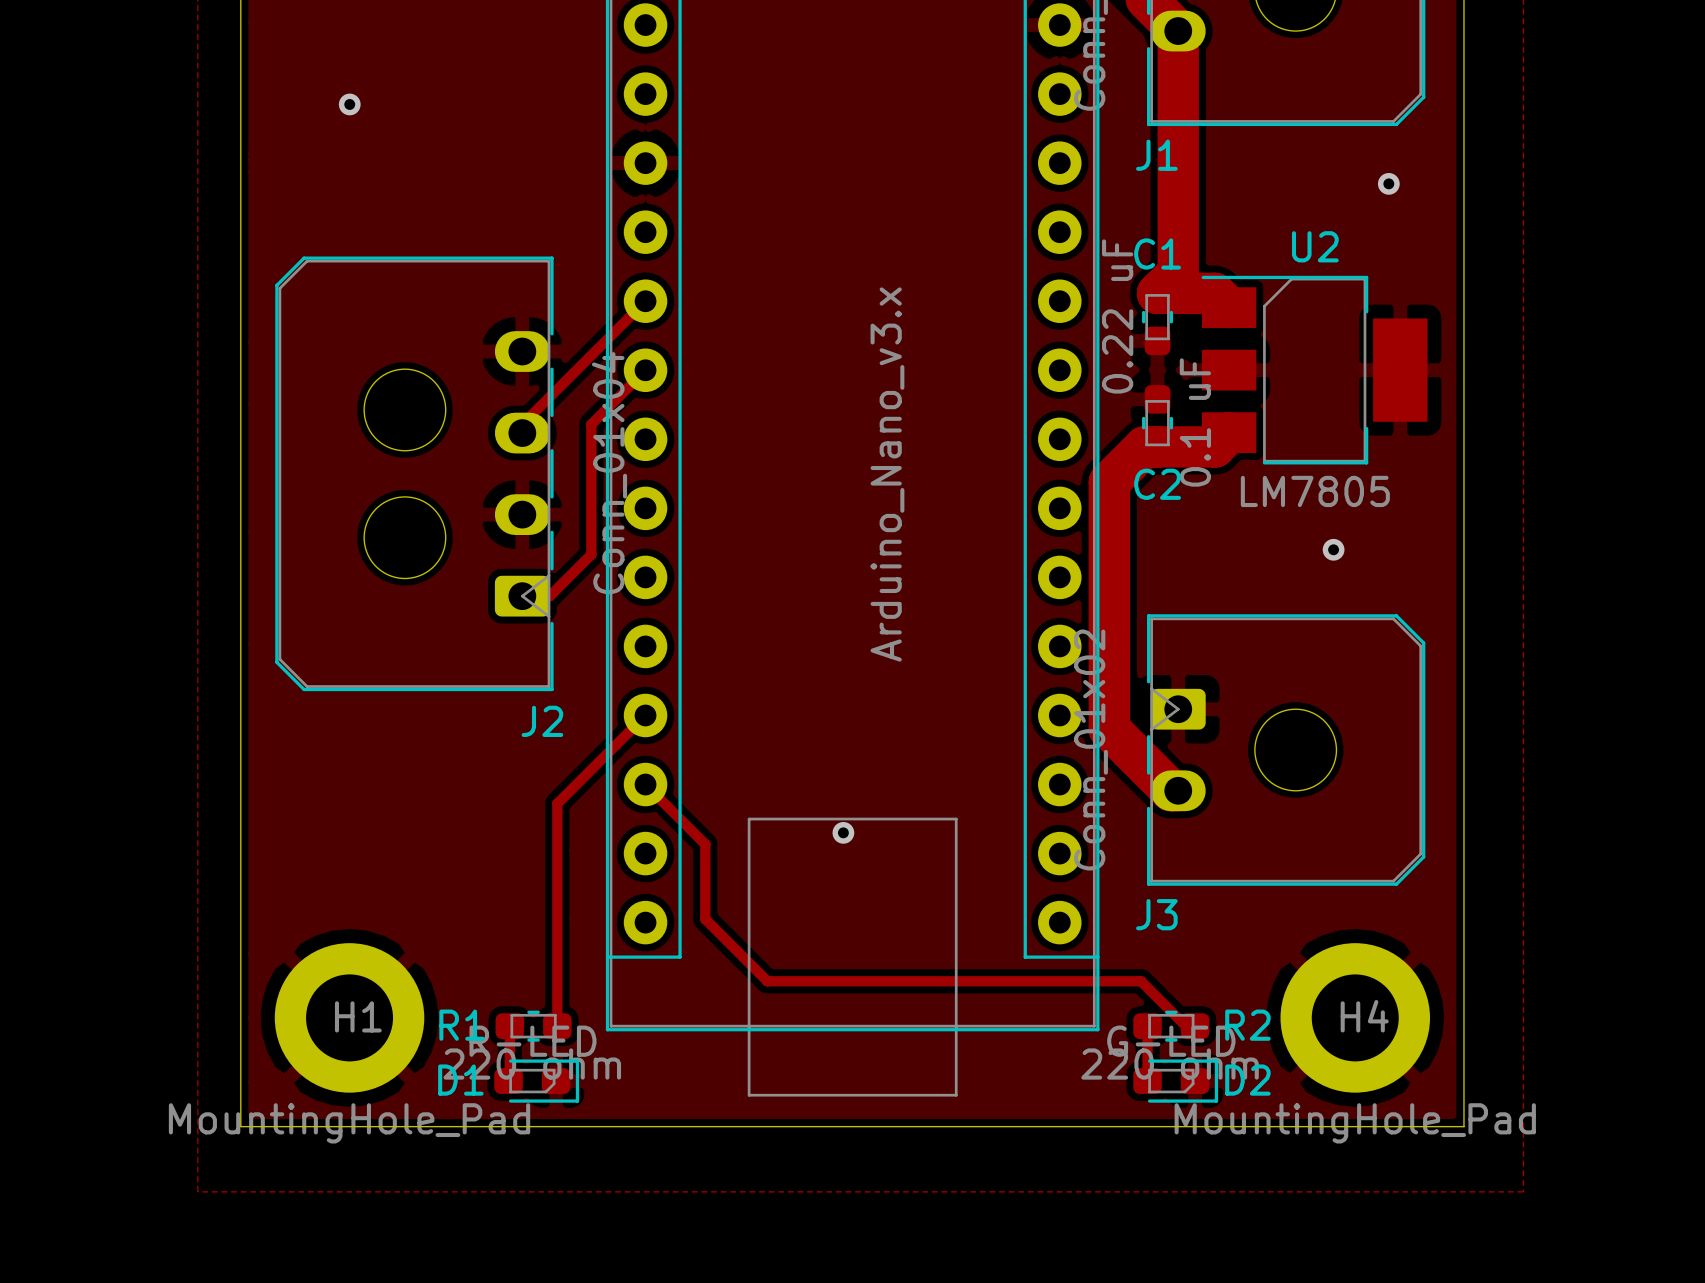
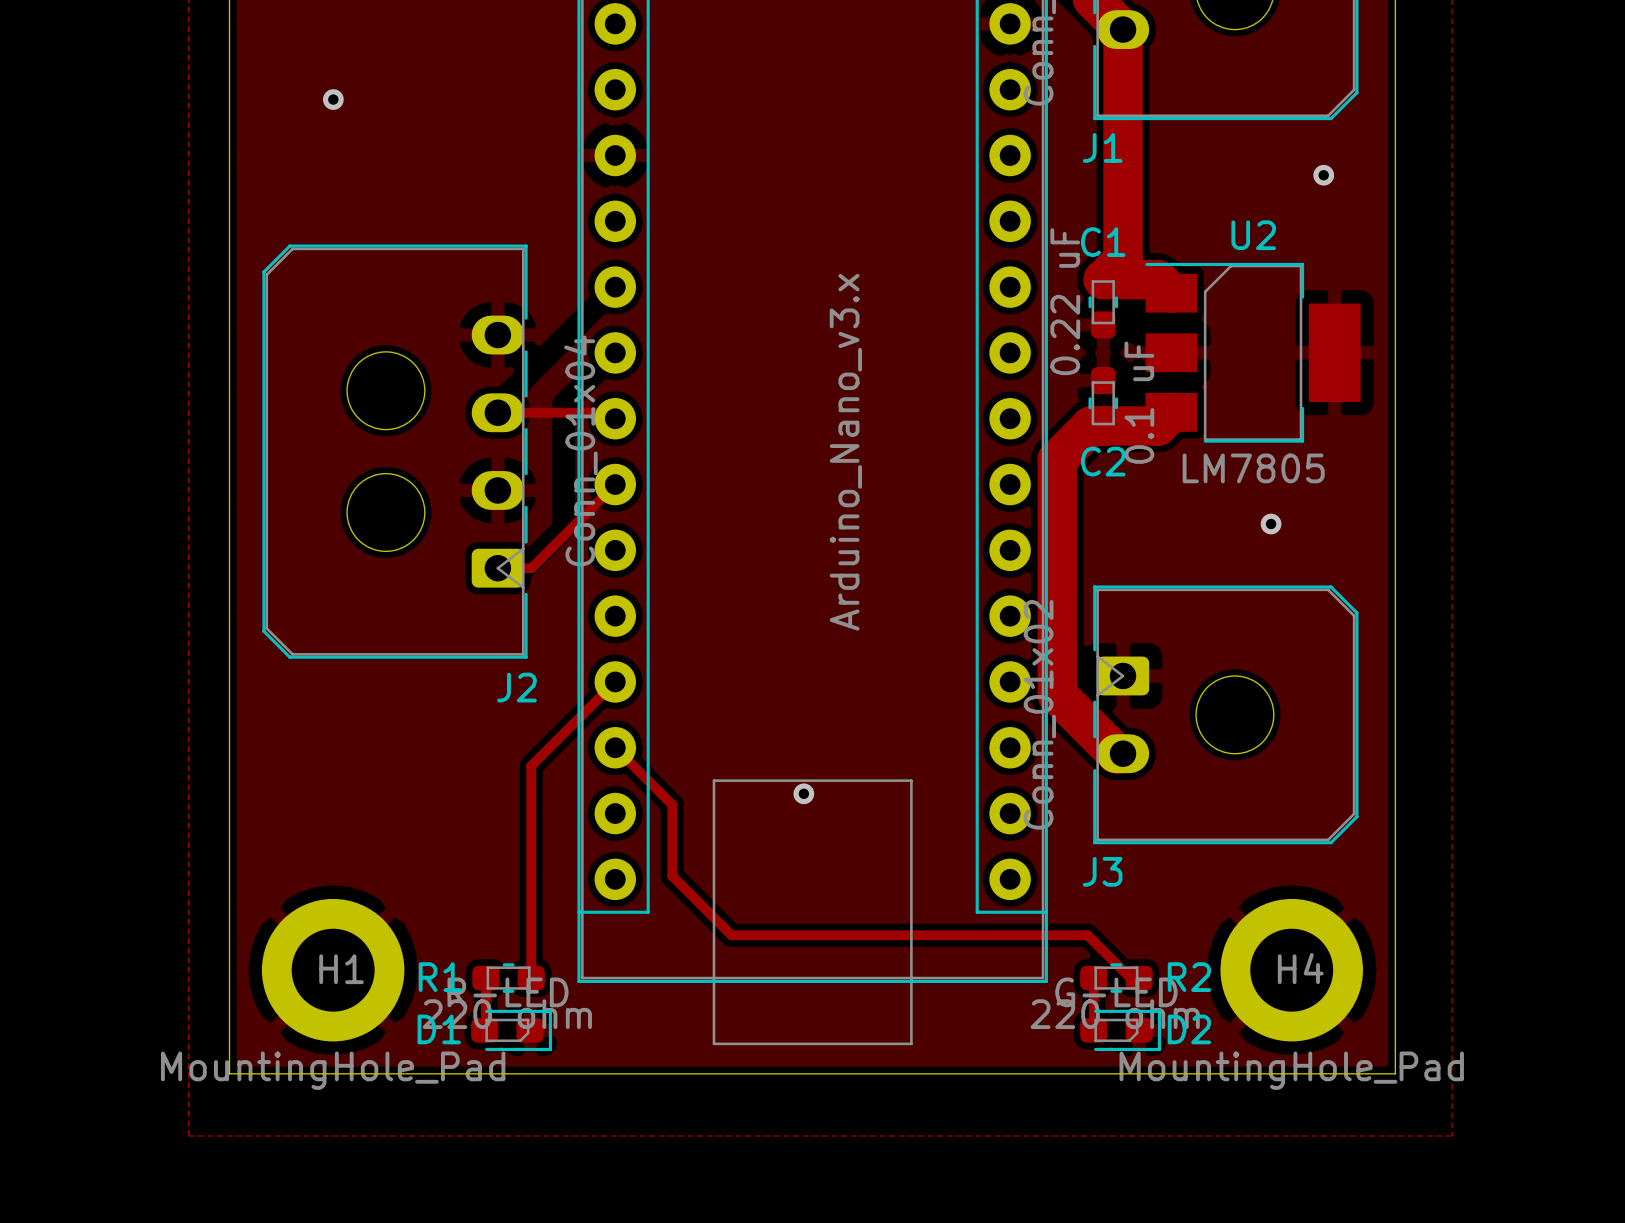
track: (645, 301) (522, 424) -> none
track: (645, 370) (591, 424) (591, 554) (549, 596) -> (615, 484) (531, 568) (524, 568)
track: none -> (497, 412) (609, 412) (615, 418)

